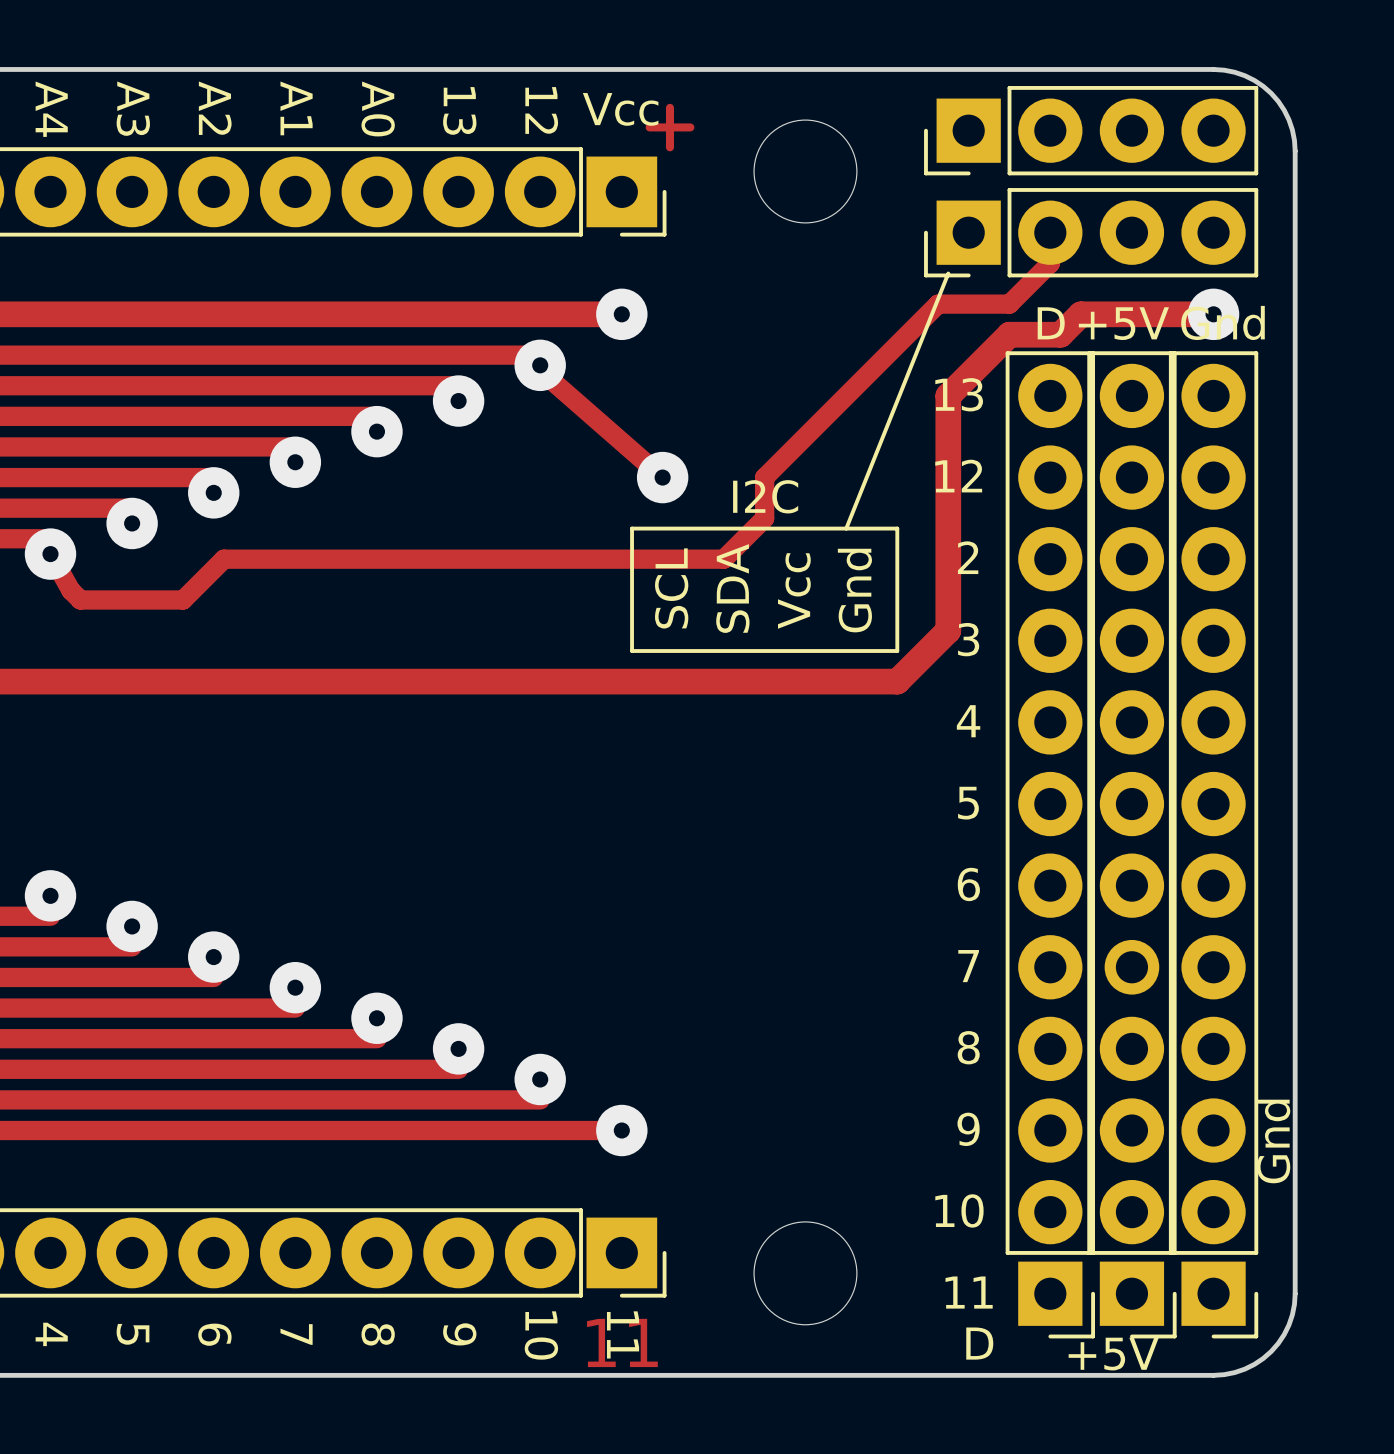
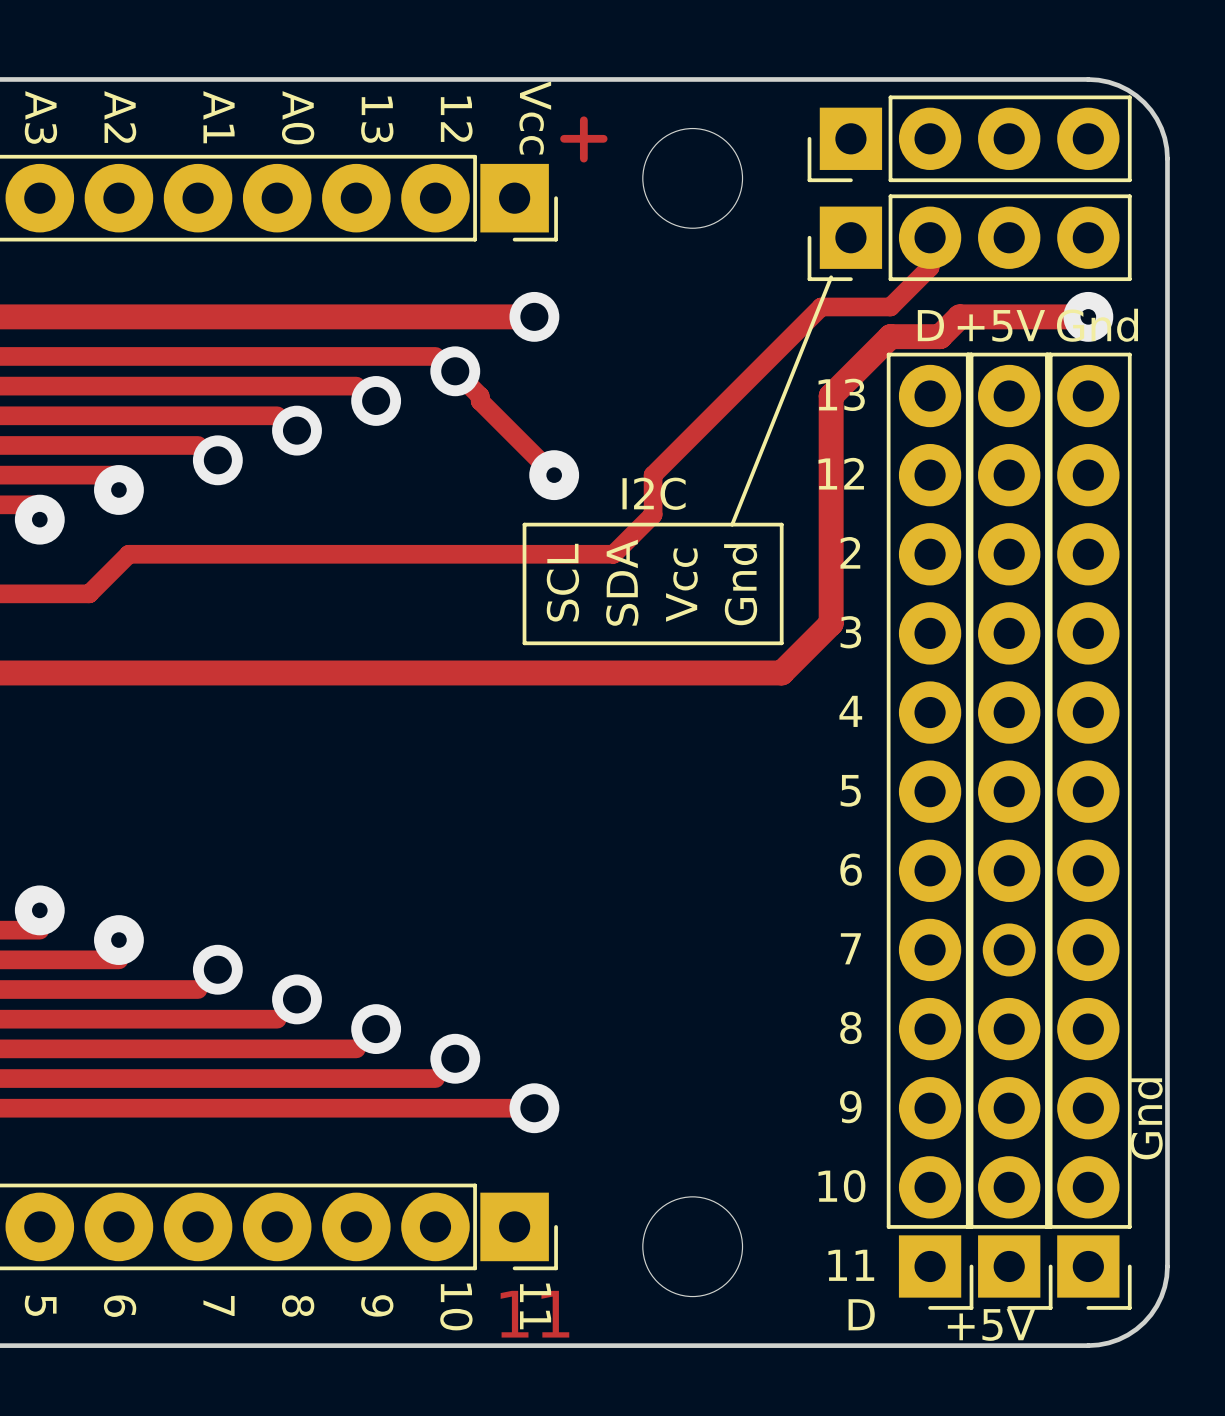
track: (669, 107) (669, 147) -> (583, 120) (583, 158)
text position: A1 (296, 108) -> A1 (219, 117)
text position: A0 (378, 108) -> A0 (298, 117)
text rotation: 0° (620, 109) -> 90° clockwise (535, 117)
text position: 13 (459, 110) -> 13 (377, 119)
text position: 12 (541, 110) -> 12 (456, 119)
track: (649, 127) (690, 127) -> (564, 138) (603, 138)
via position: (621, 314) -> (534, 316)
via position: (540, 365) -> (455, 371)
track: (540, 370) (662, 477) -> (455, 371) (480, 396) (480, 401) (554, 475)
via position: (458, 401) -> (376, 400)
via position: (376, 431) -> (296, 430)
via position: (295, 462) -> (217, 460)
via position: (295, 987) -> (217, 969)
via position: (376, 1018) -> (296, 999)
via position: (458, 1048) -> (376, 1029)
via position: (540, 1079) -> (455, 1058)
via position: (621, 1130) -> (534, 1108)
text position: 7 (296, 1334) -> 7 (219, 1305)
text position: 8 (378, 1334) -> 8 (298, 1306)
text position: 9 (459, 1334) -> 9 (377, 1305)
text: 11 (623, 1334) -> none
text: none -> 11 (535, 1306)
text position: 10 (541, 1335) -> 10 (456, 1306)
text: 11 (622, 1342) -> none
text: none -> 11 (534, 1314)

